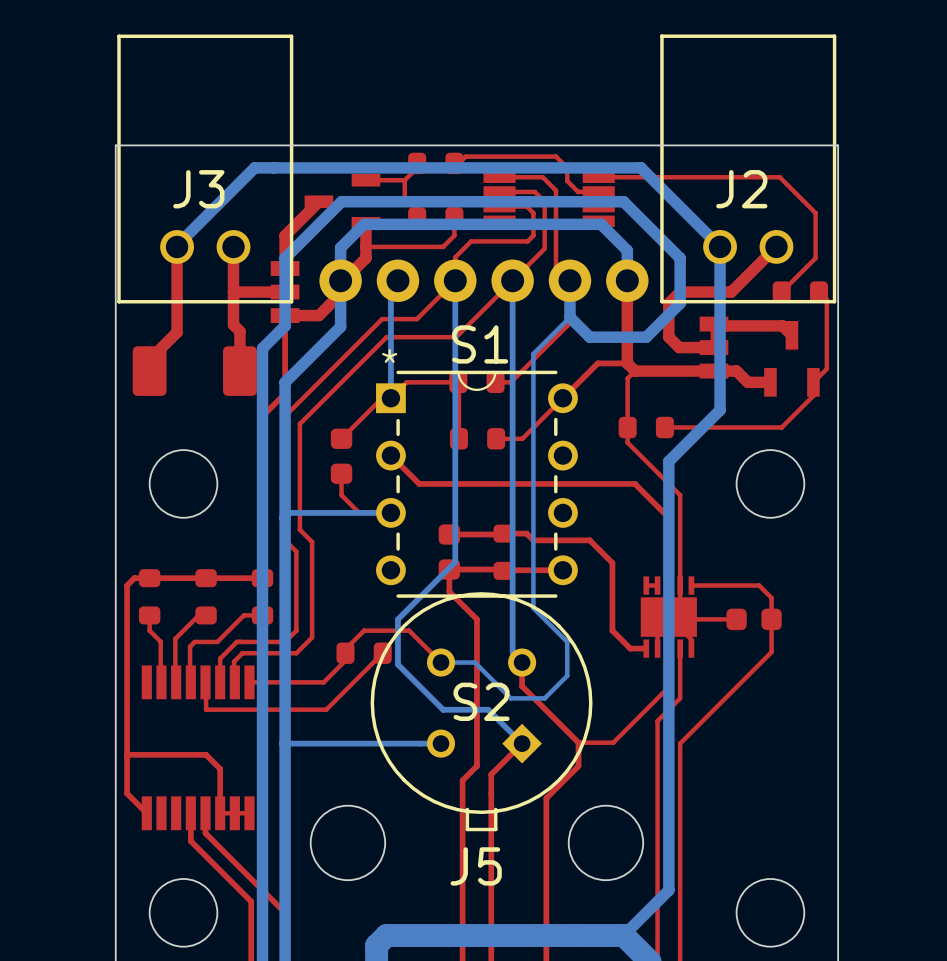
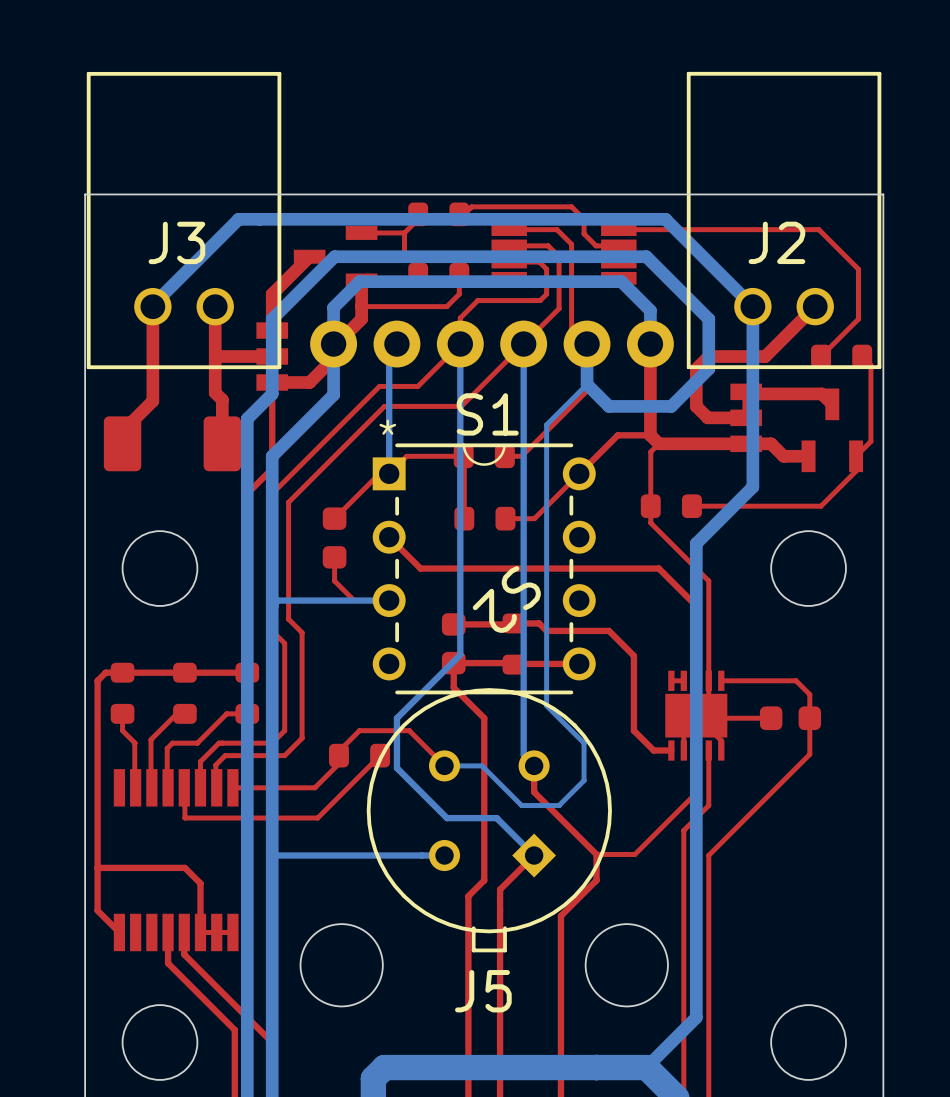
S2 name rotation: 0° (481, 701) -> 135° clockwise (506, 599)
S2 name position: S2 (481, 701) -> S2 (506, 599)

